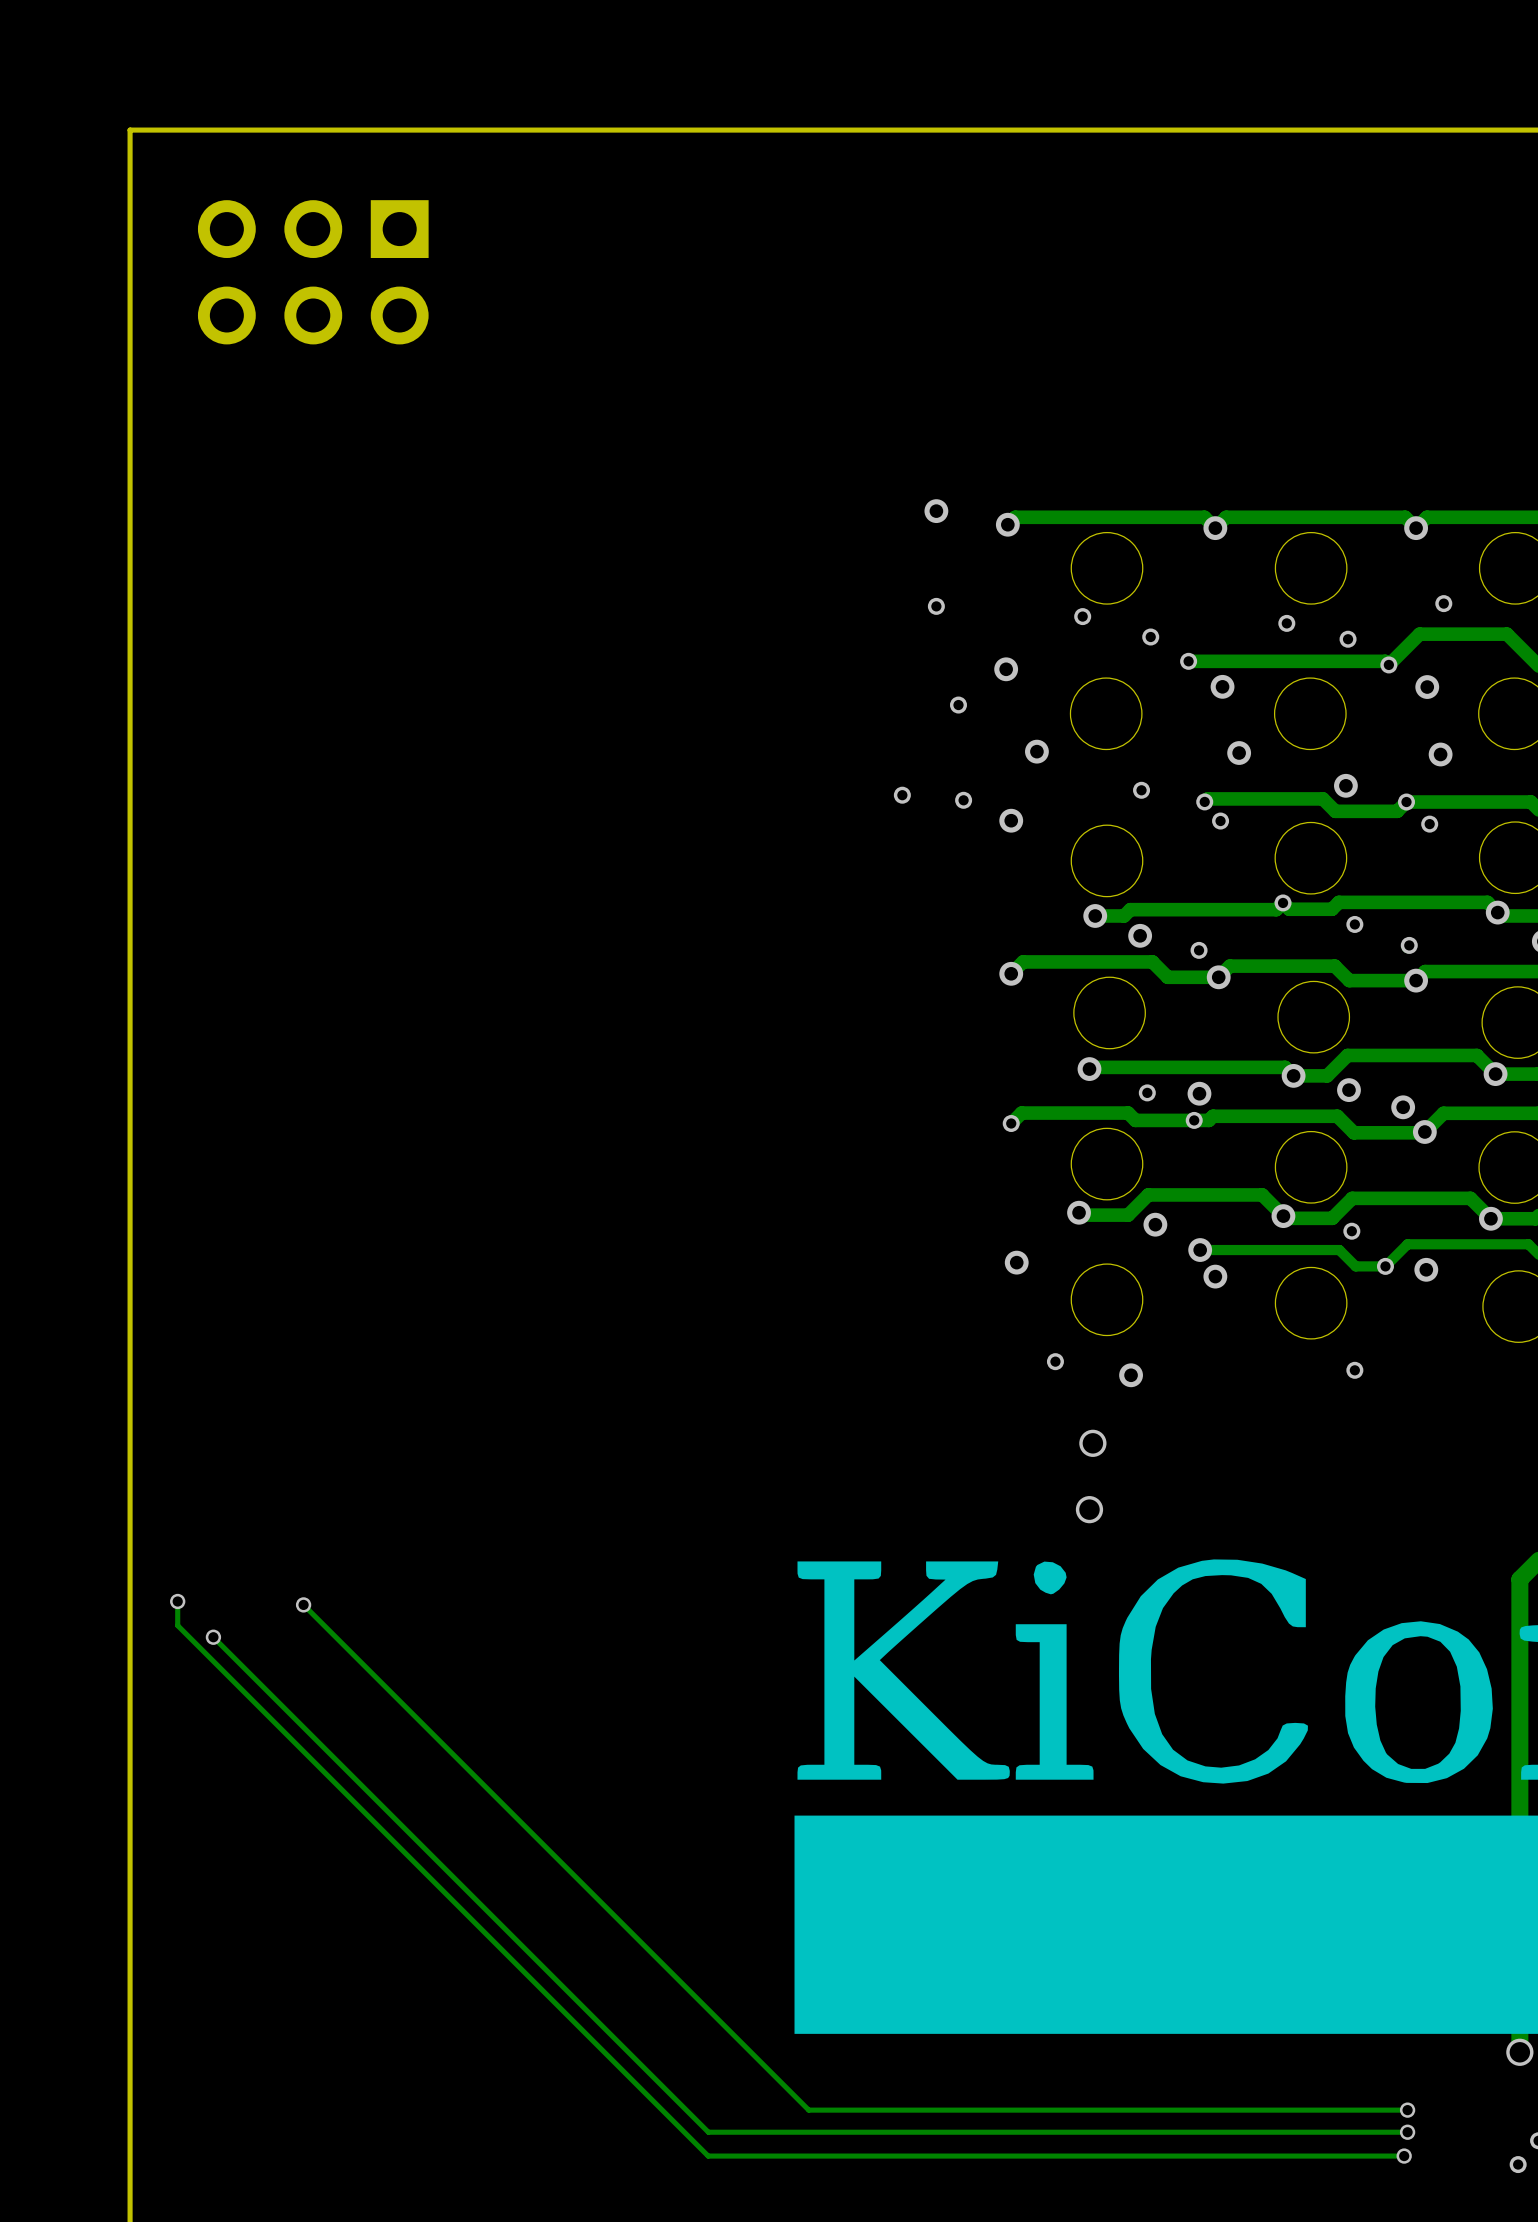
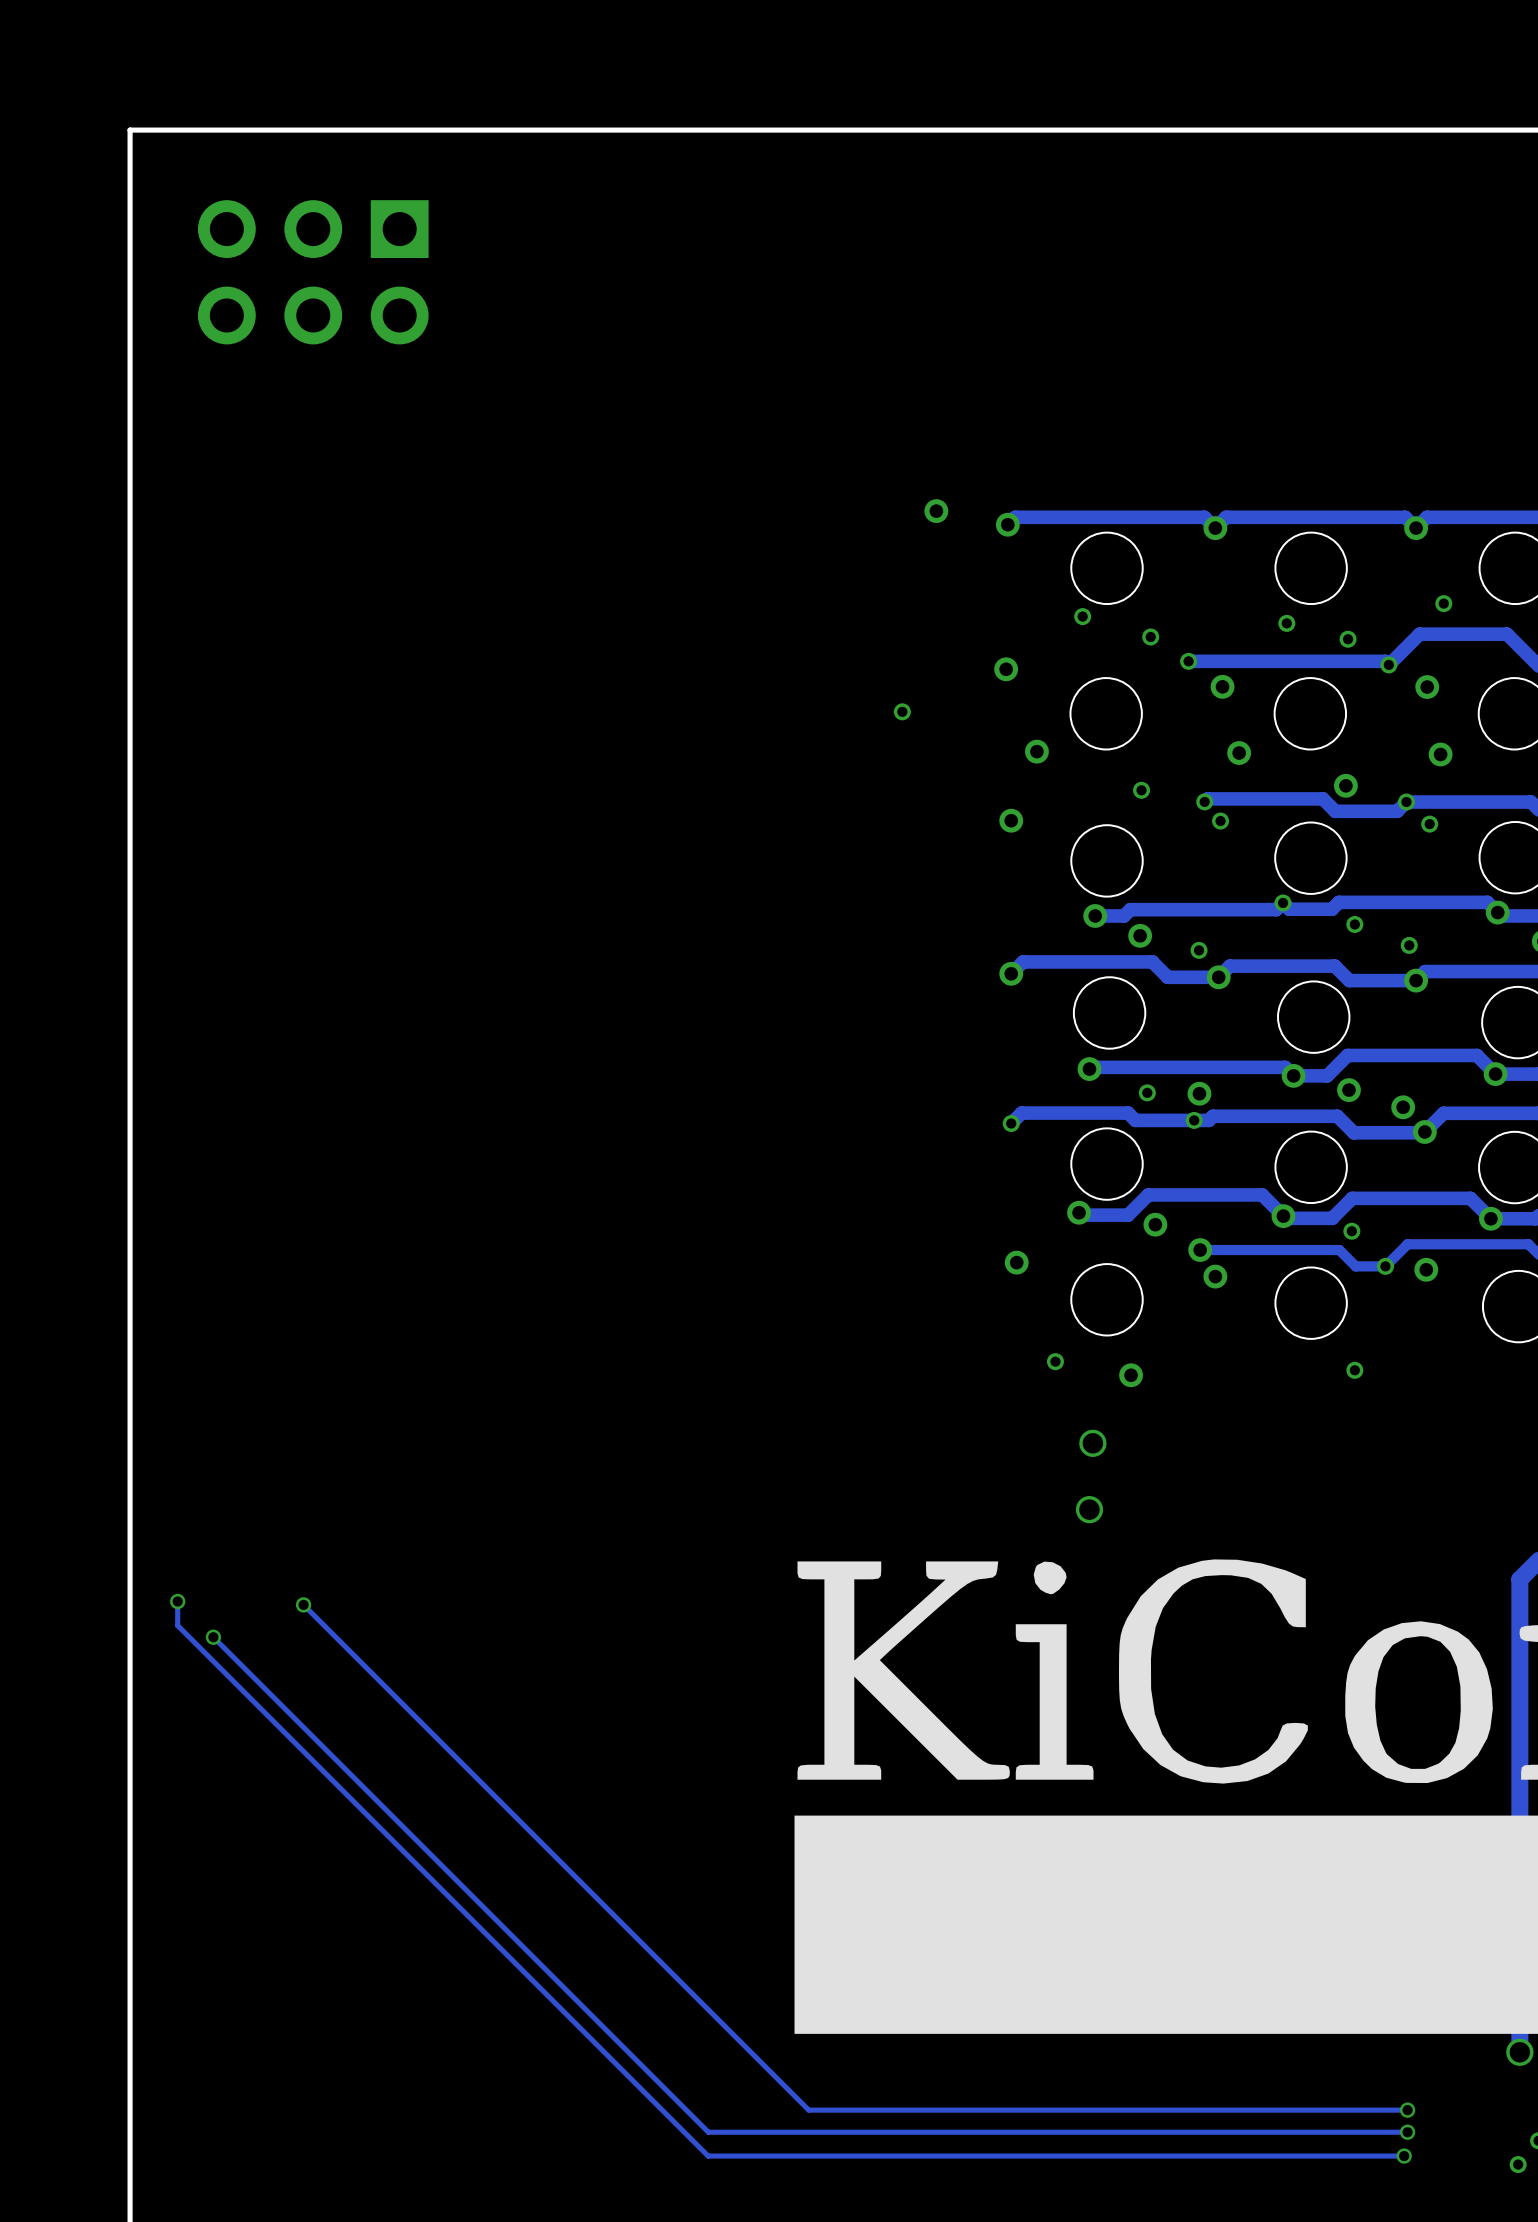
via: (936, 606) -> none
via: (958, 705) -> none
via: none -> (902, 711)
via: (902, 795) -> none
via: (963, 800) -> none

